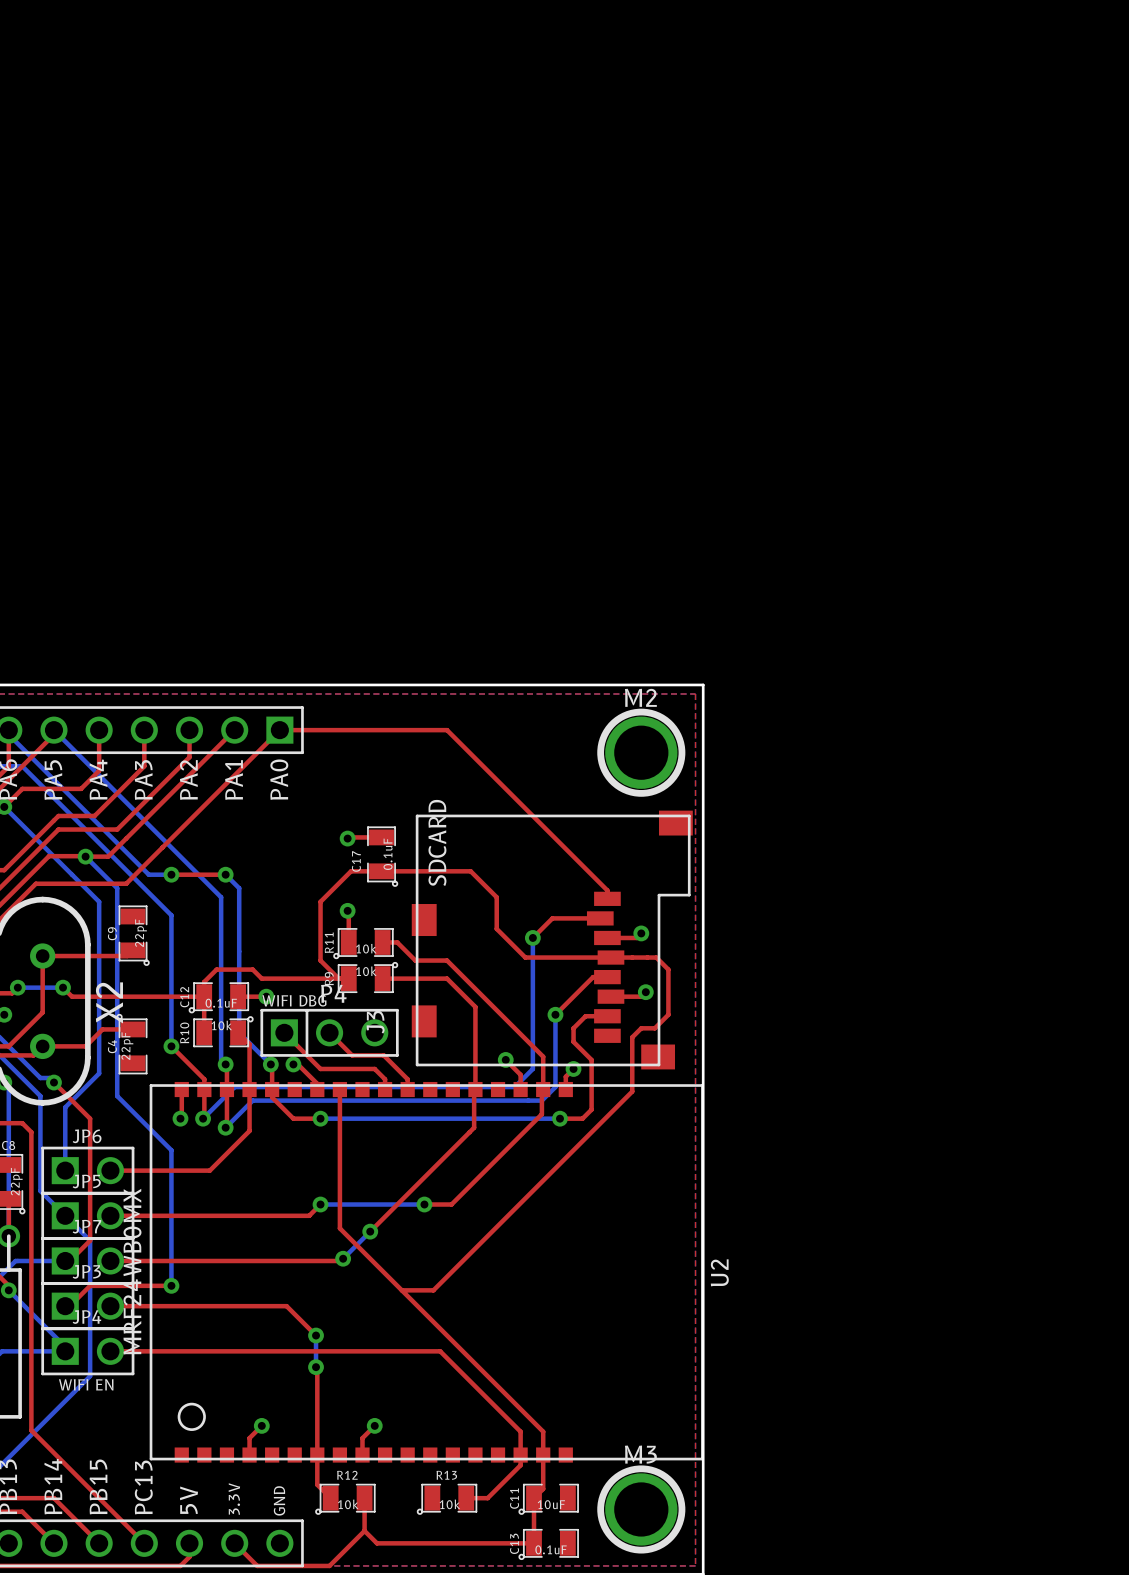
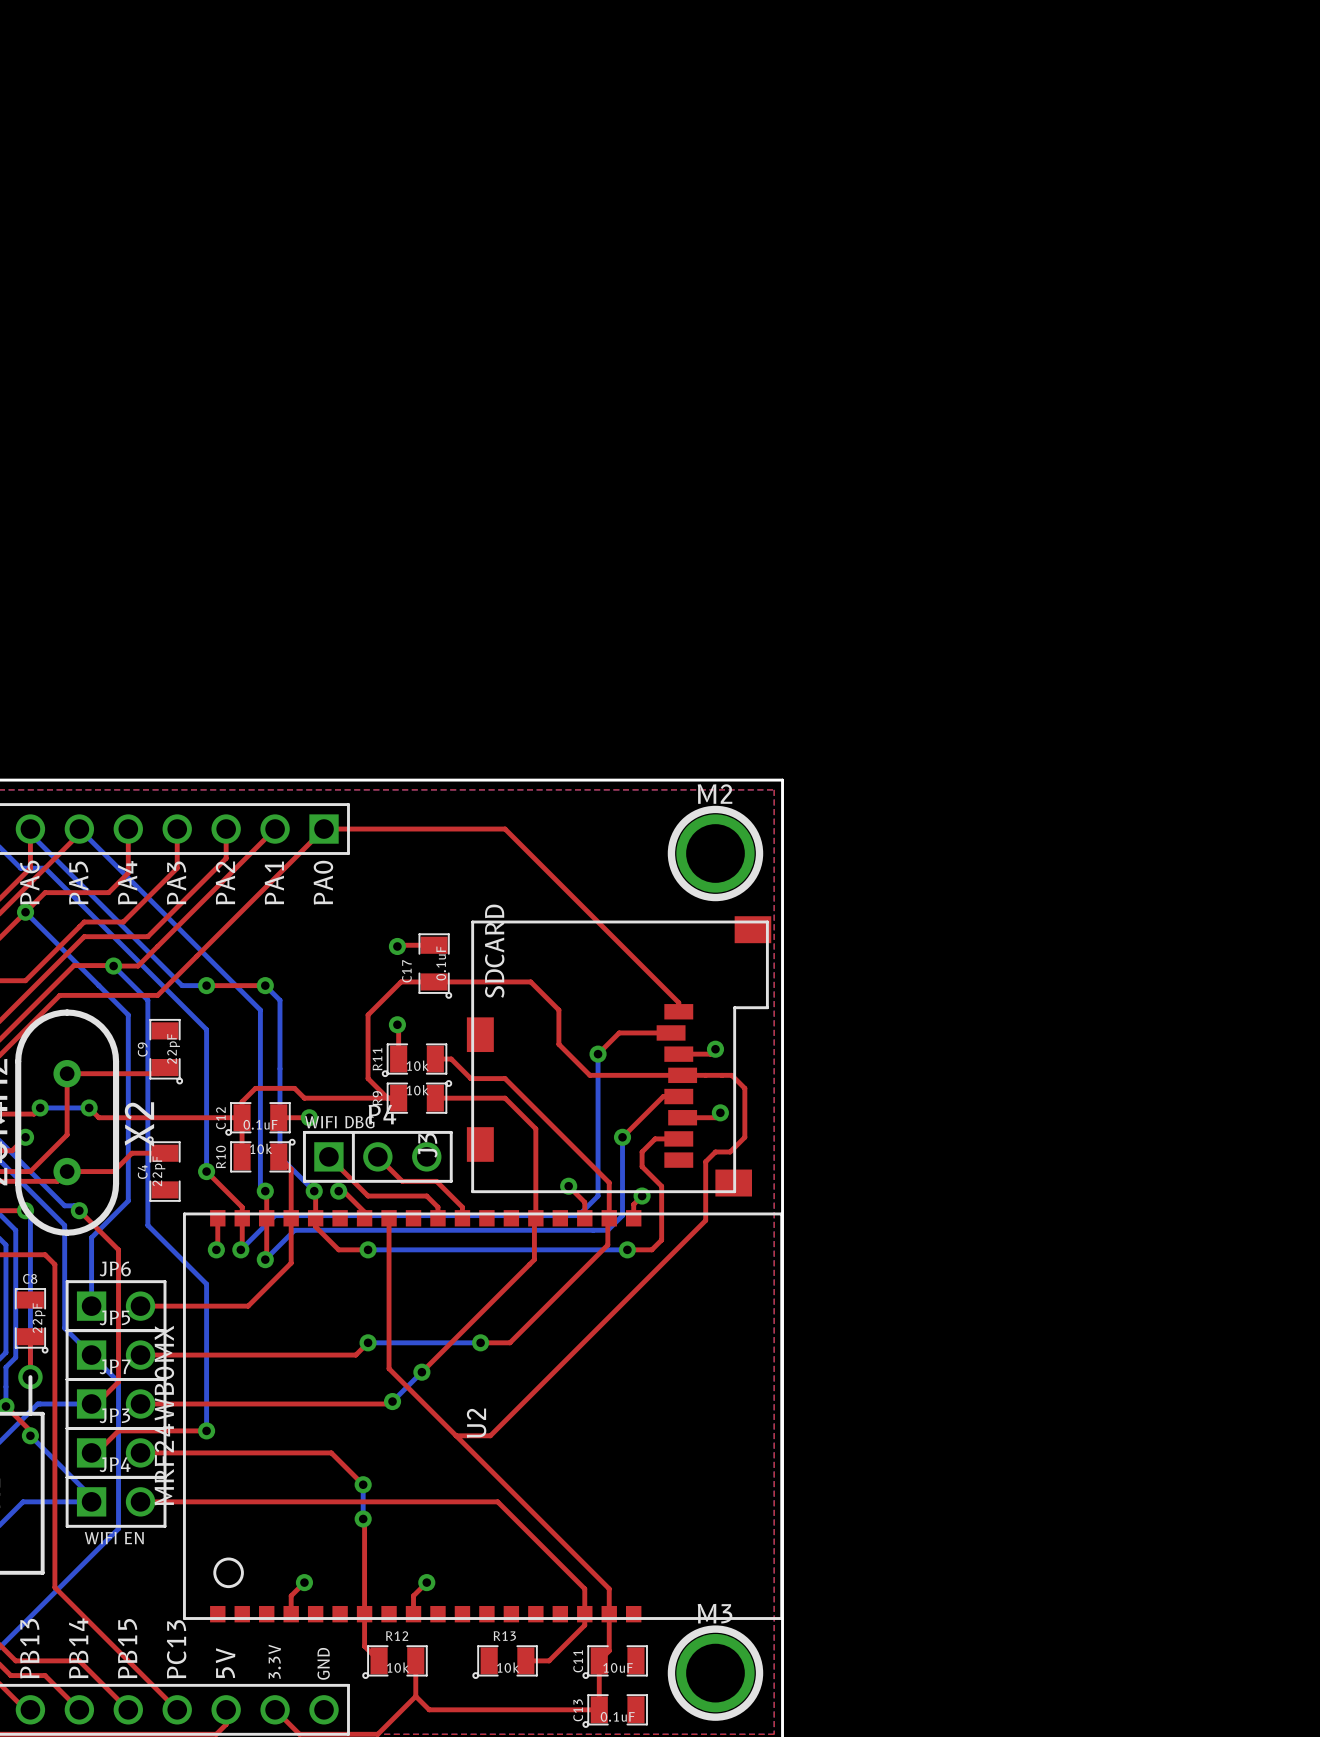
U2 name position: U2 (719, 1272) -> U2 (476, 1423)

